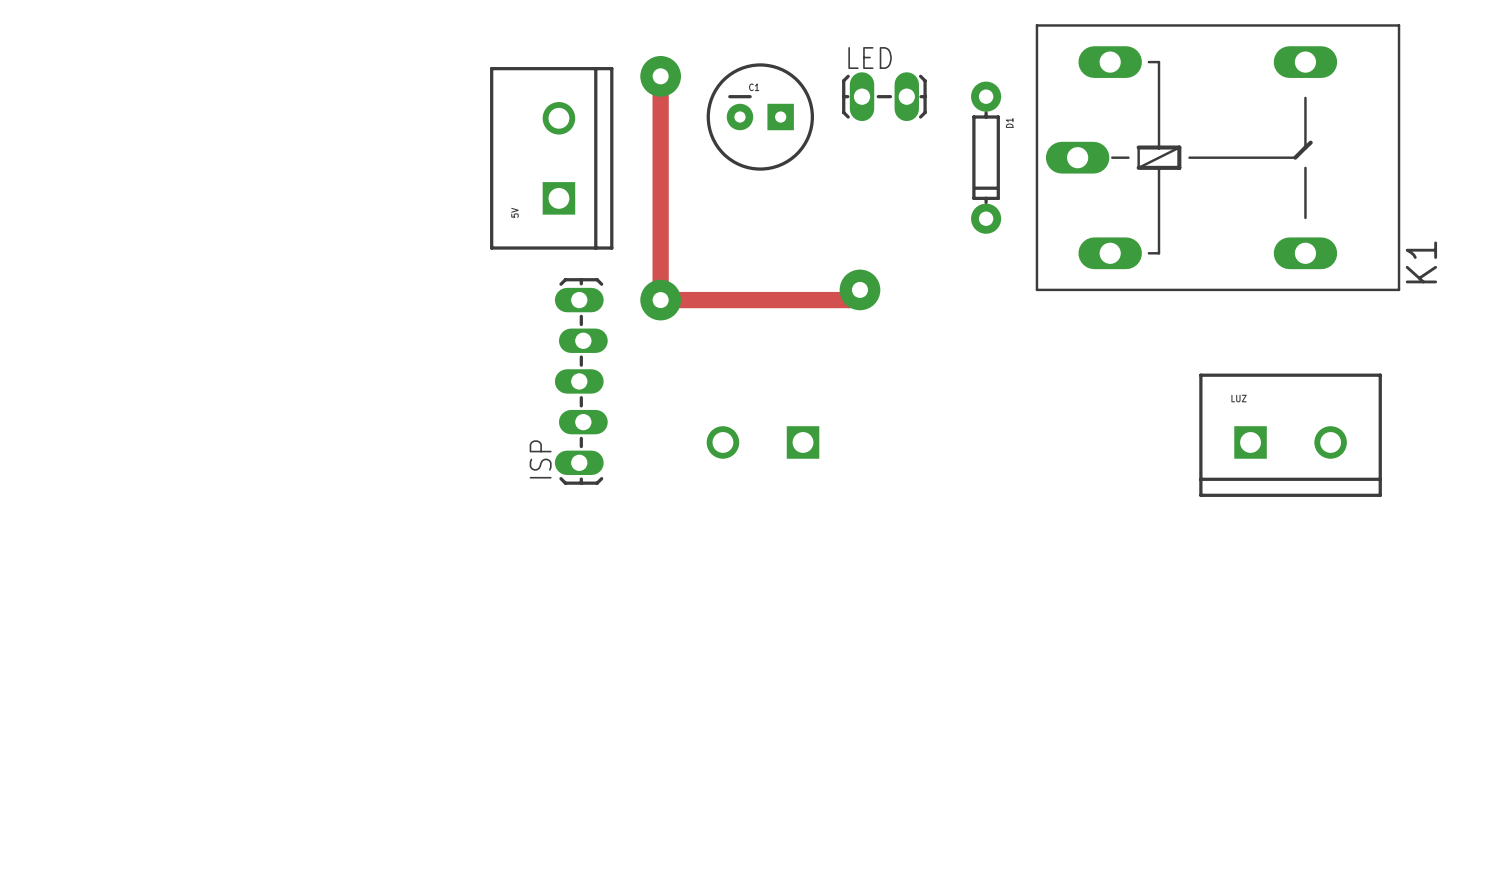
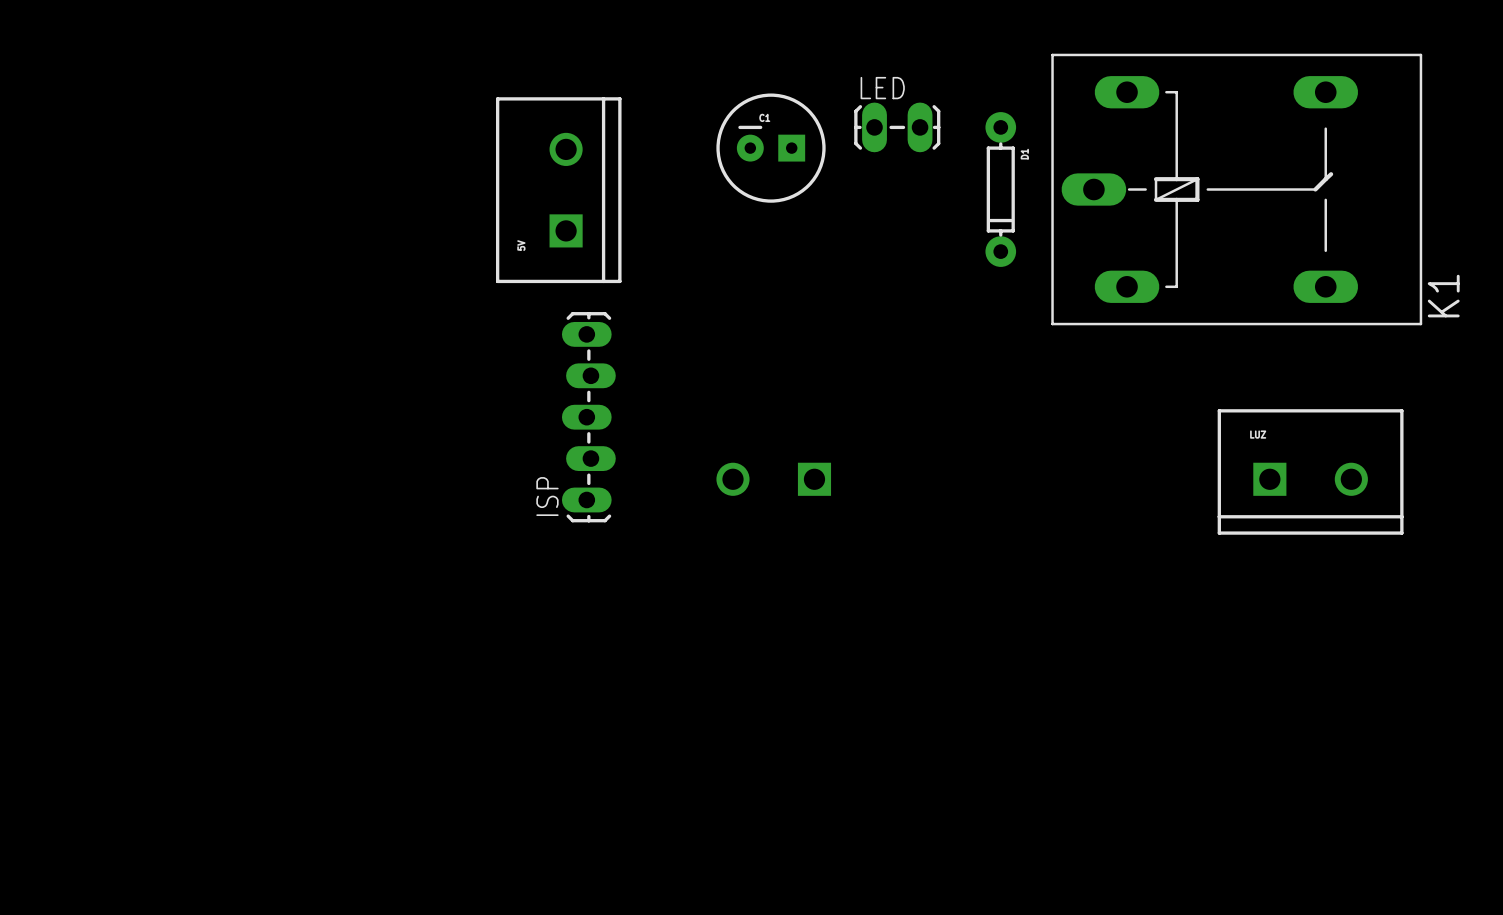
track: (660, 76) (660, 300) (849, 300) (859, 289) -> none
via: (660, 76) -> none
via: (859, 289) -> none
via: (660, 300) -> none

